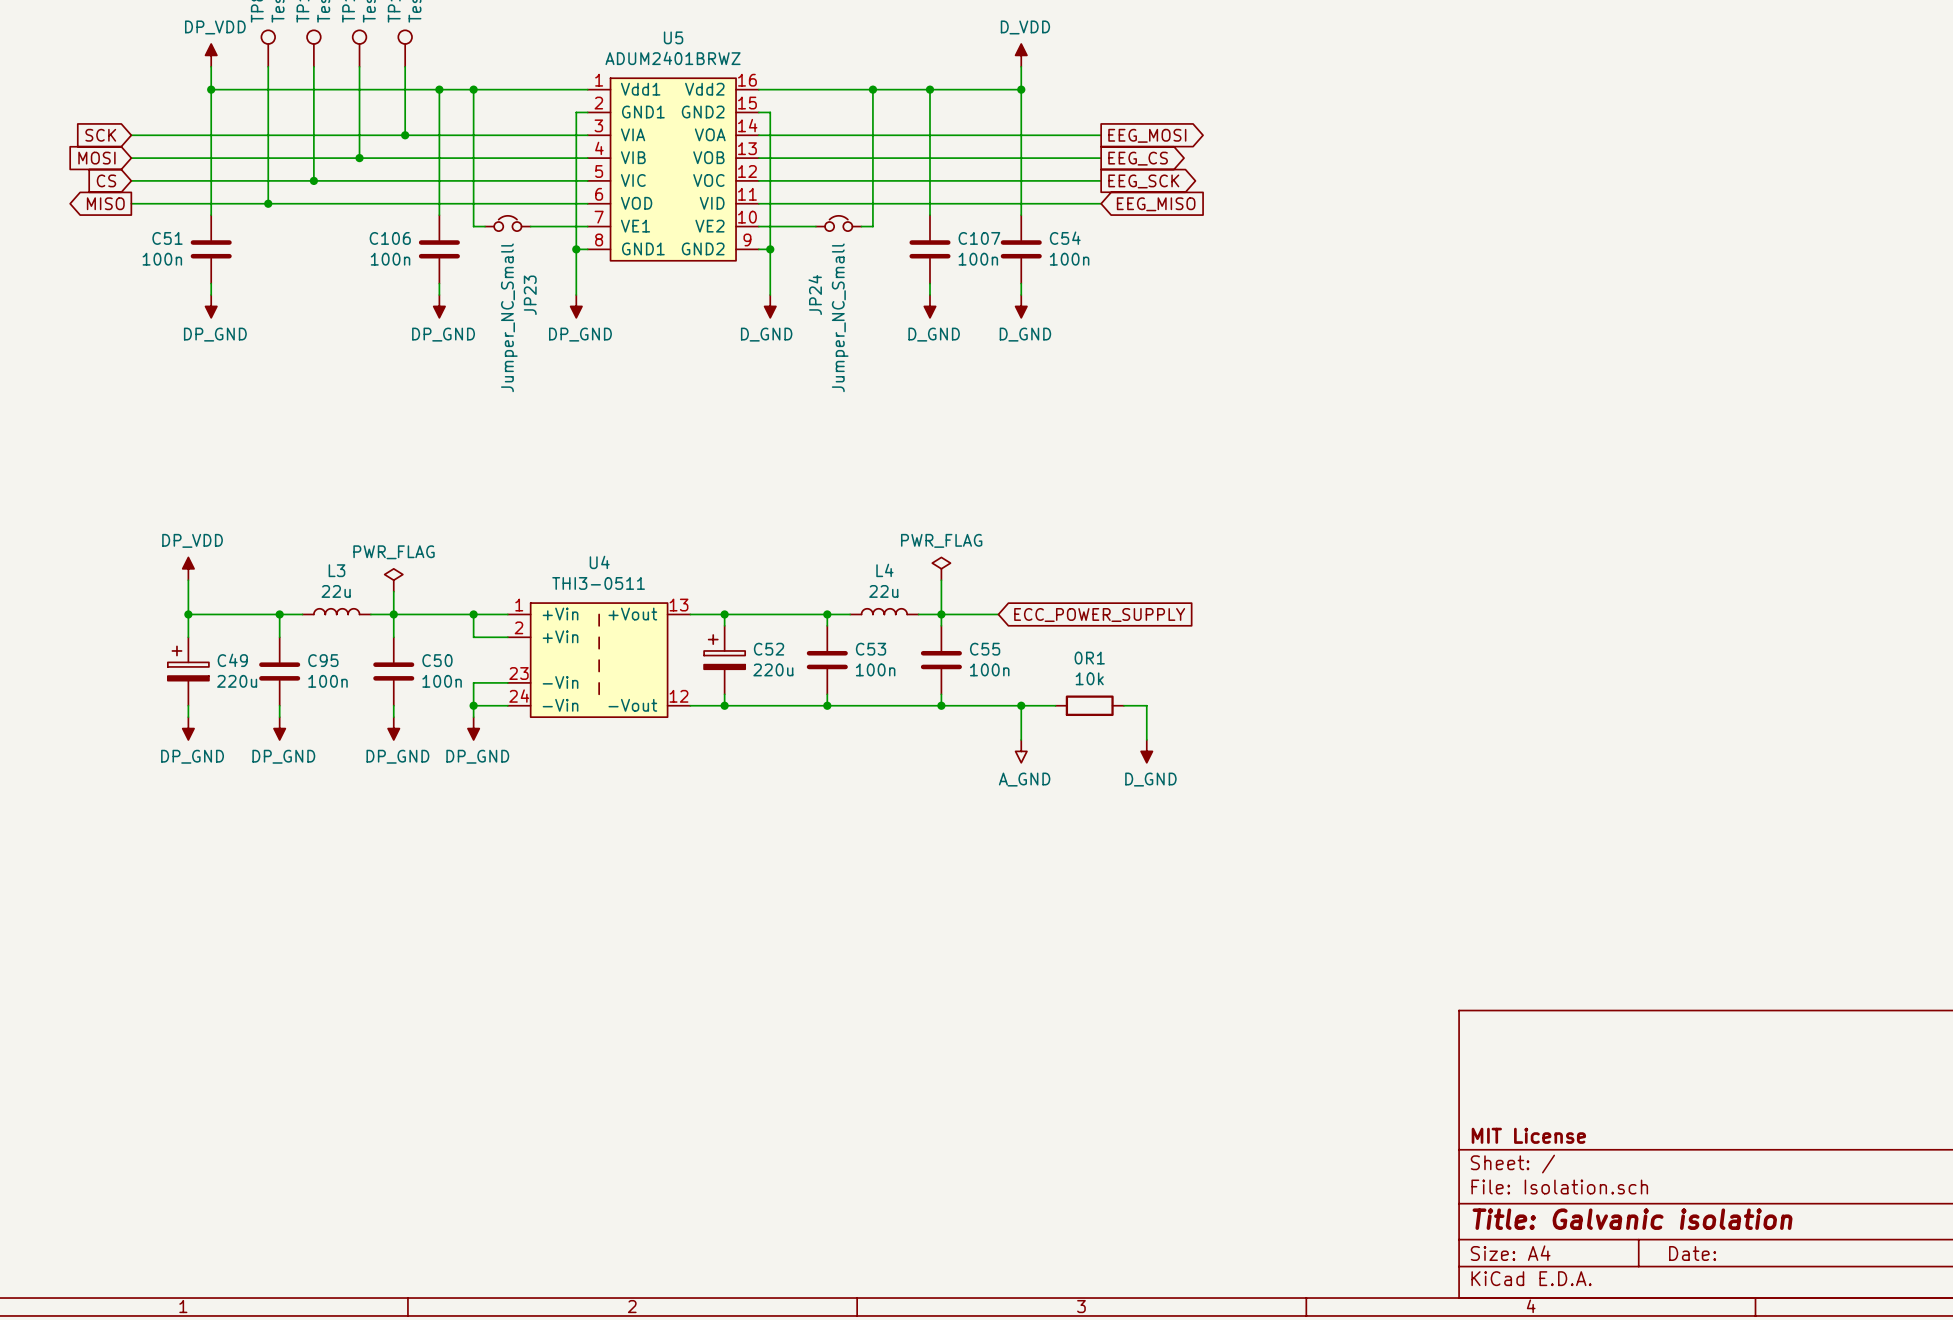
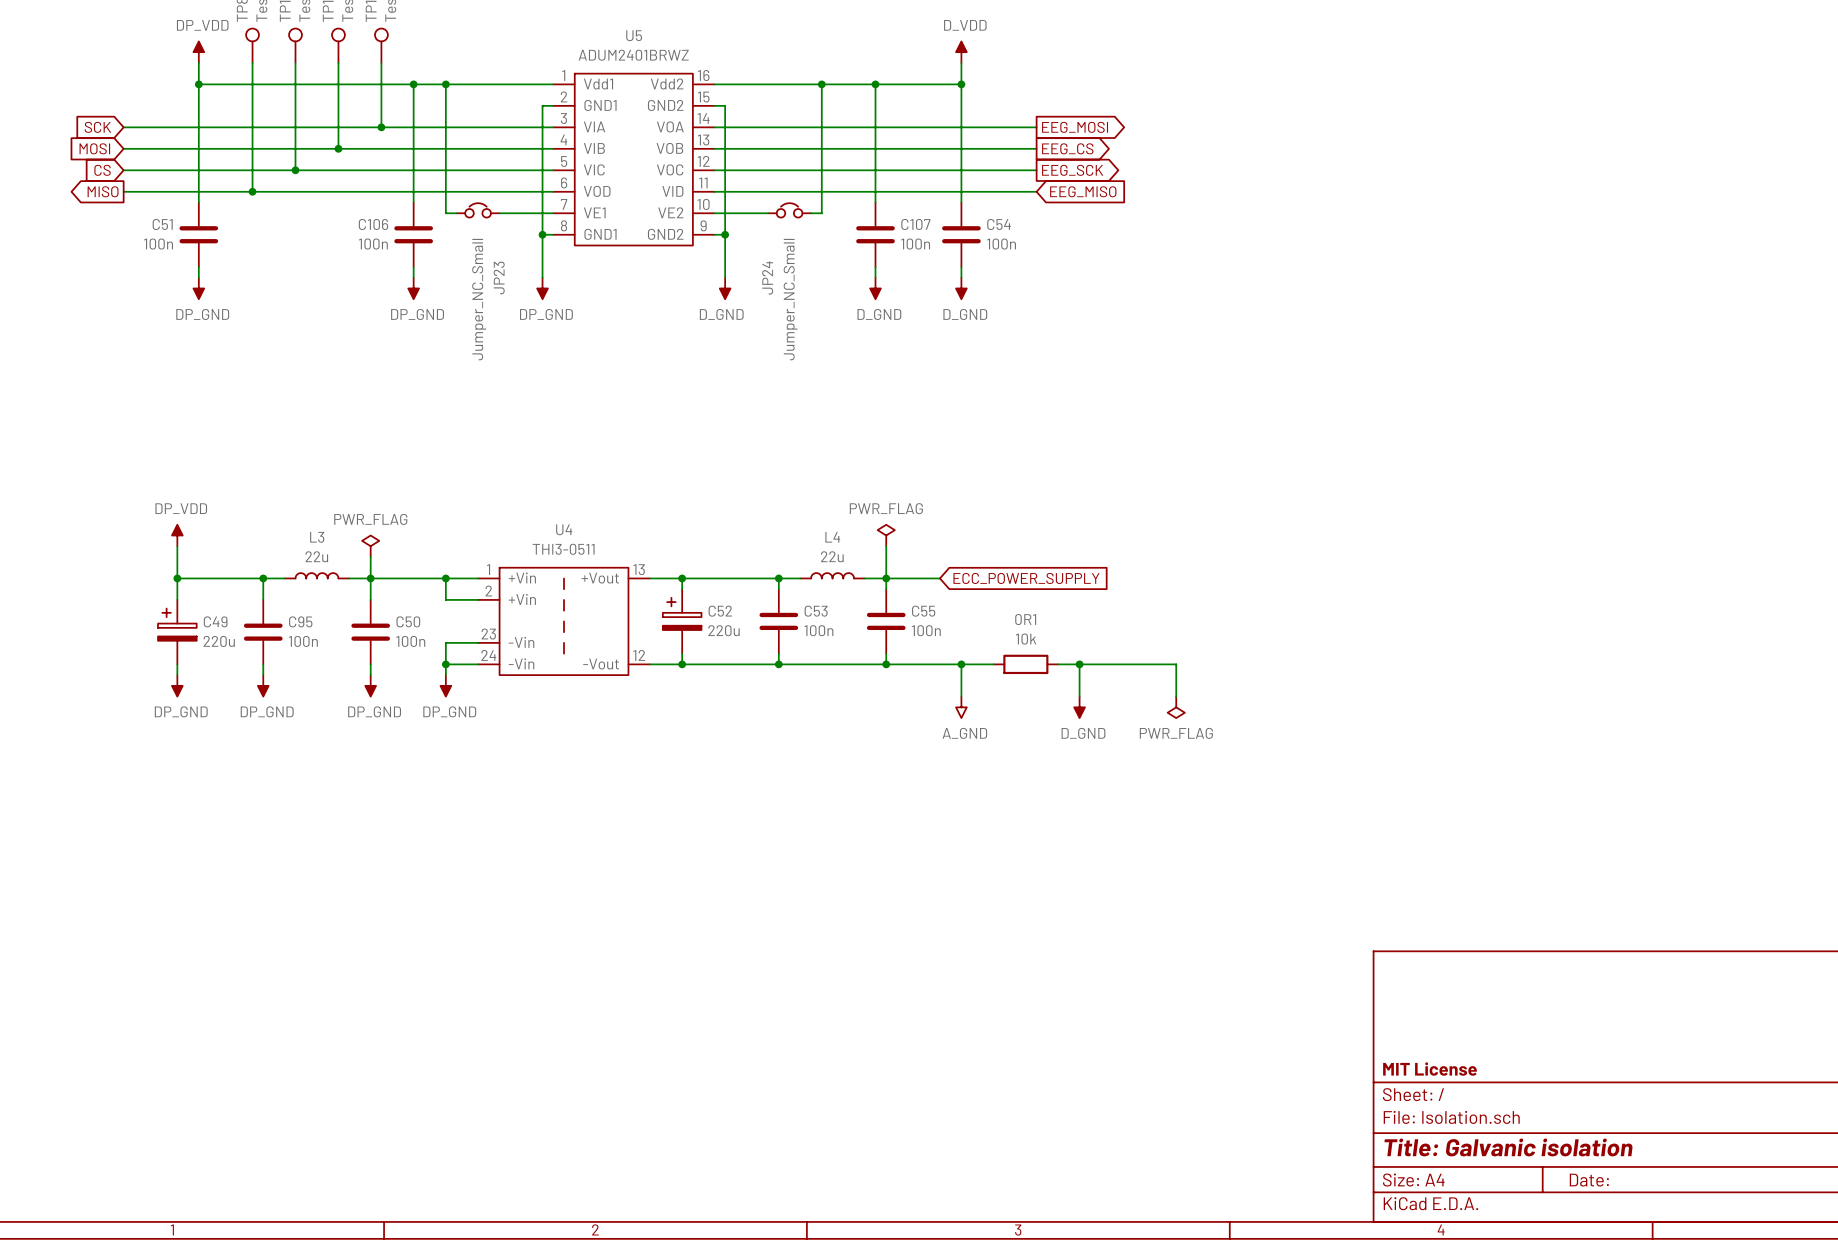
wire: none -> (1079, 664) (1176, 664) (1176, 696)
junction: none -> (1079, 664)
power symbol: none -> PWR_FLAG (1176, 707)

